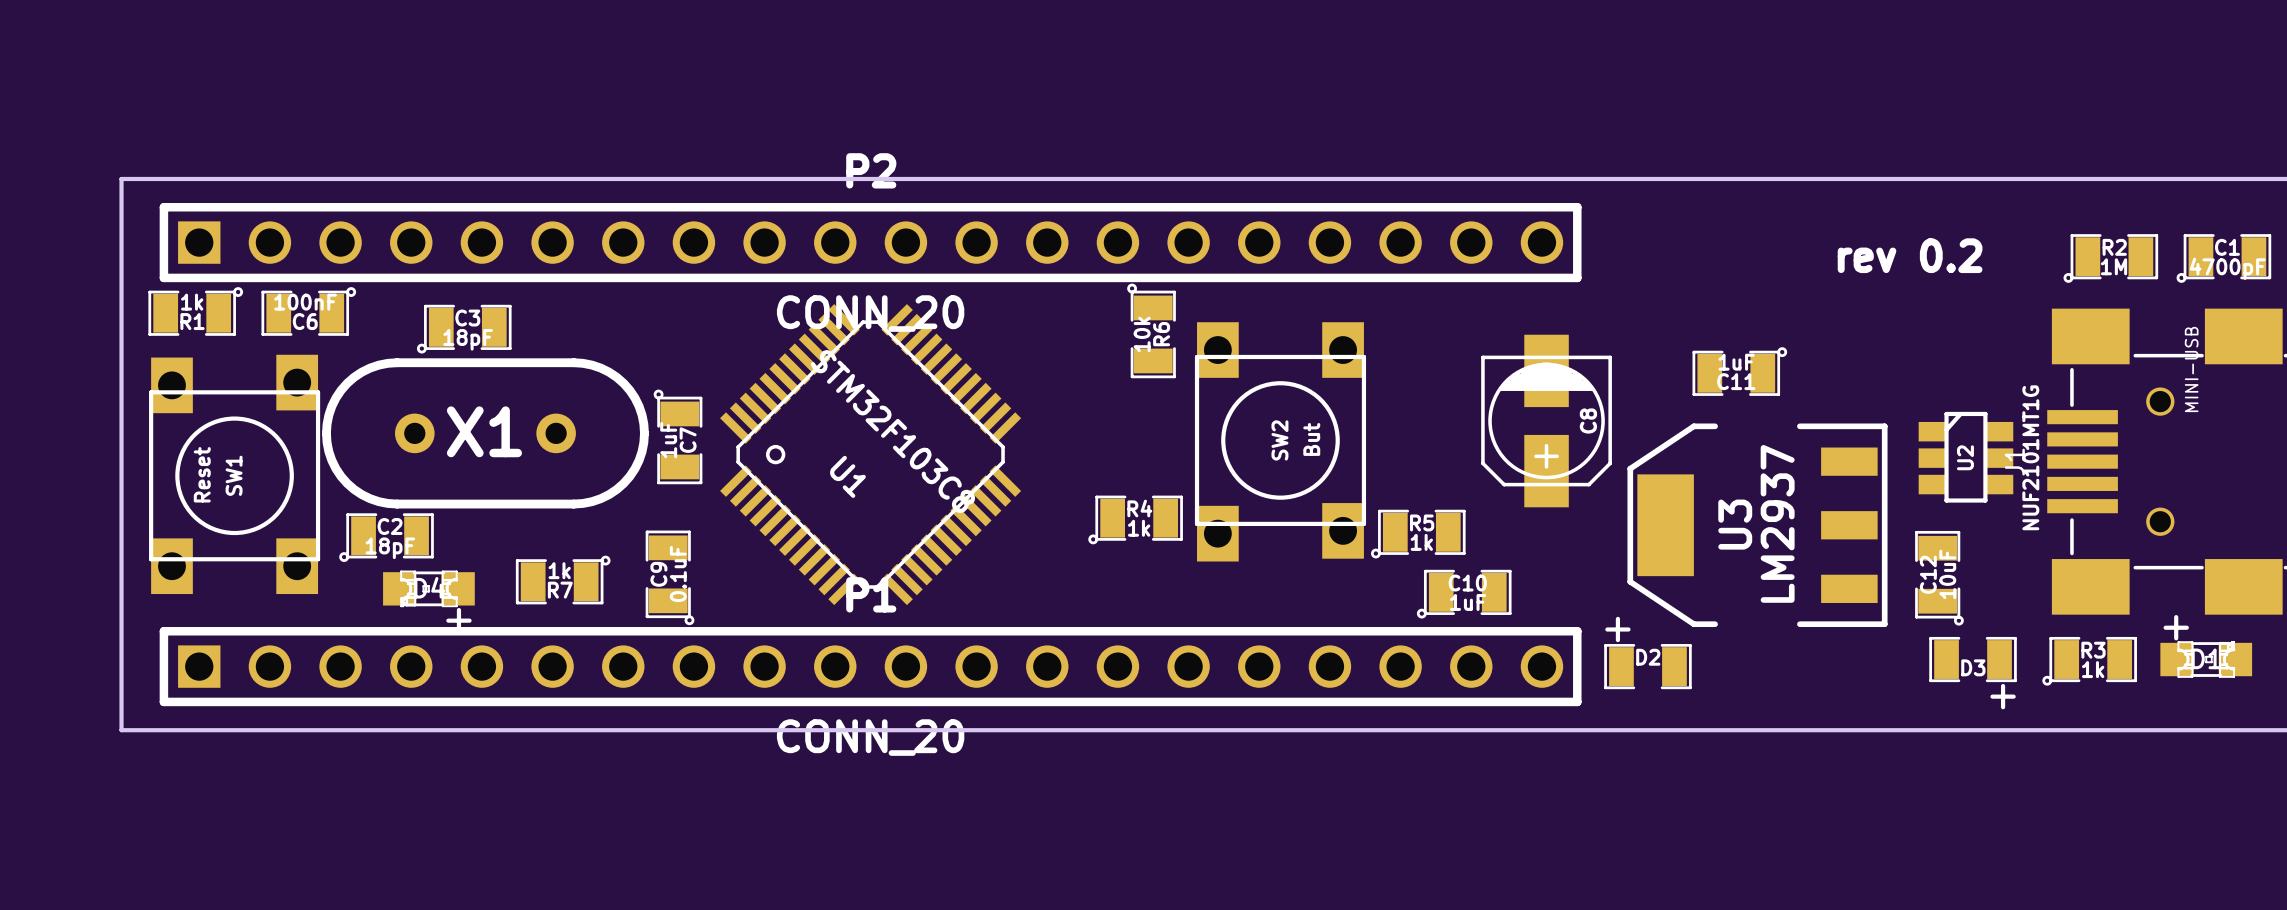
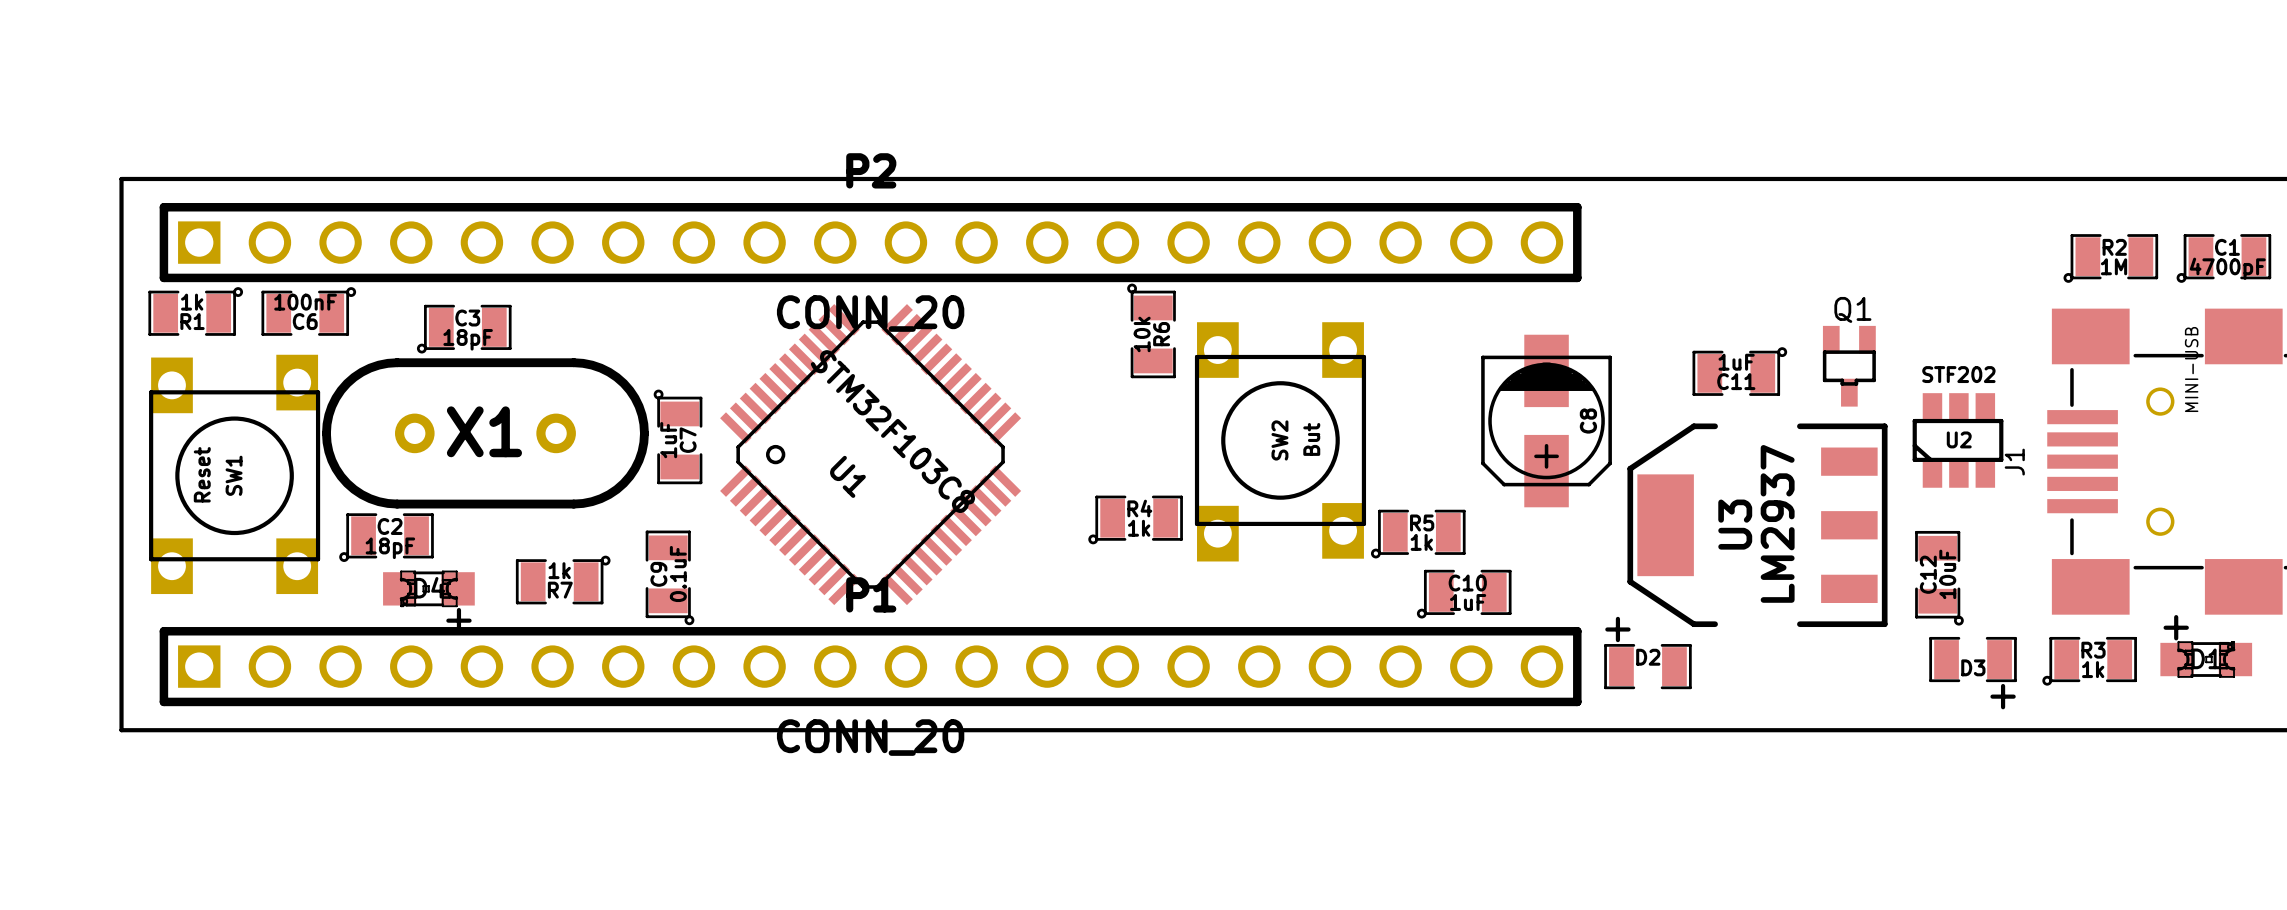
text: rev 0.2 (1910, 255) -> none
Q1: none -> (1849, 366)
U2 rotation: 0° (1965, 457) -> 90° counterclockwise (1958, 440)
U2 value: NUF2101MT1G (2030, 457) -> STF202 (1958, 374)

